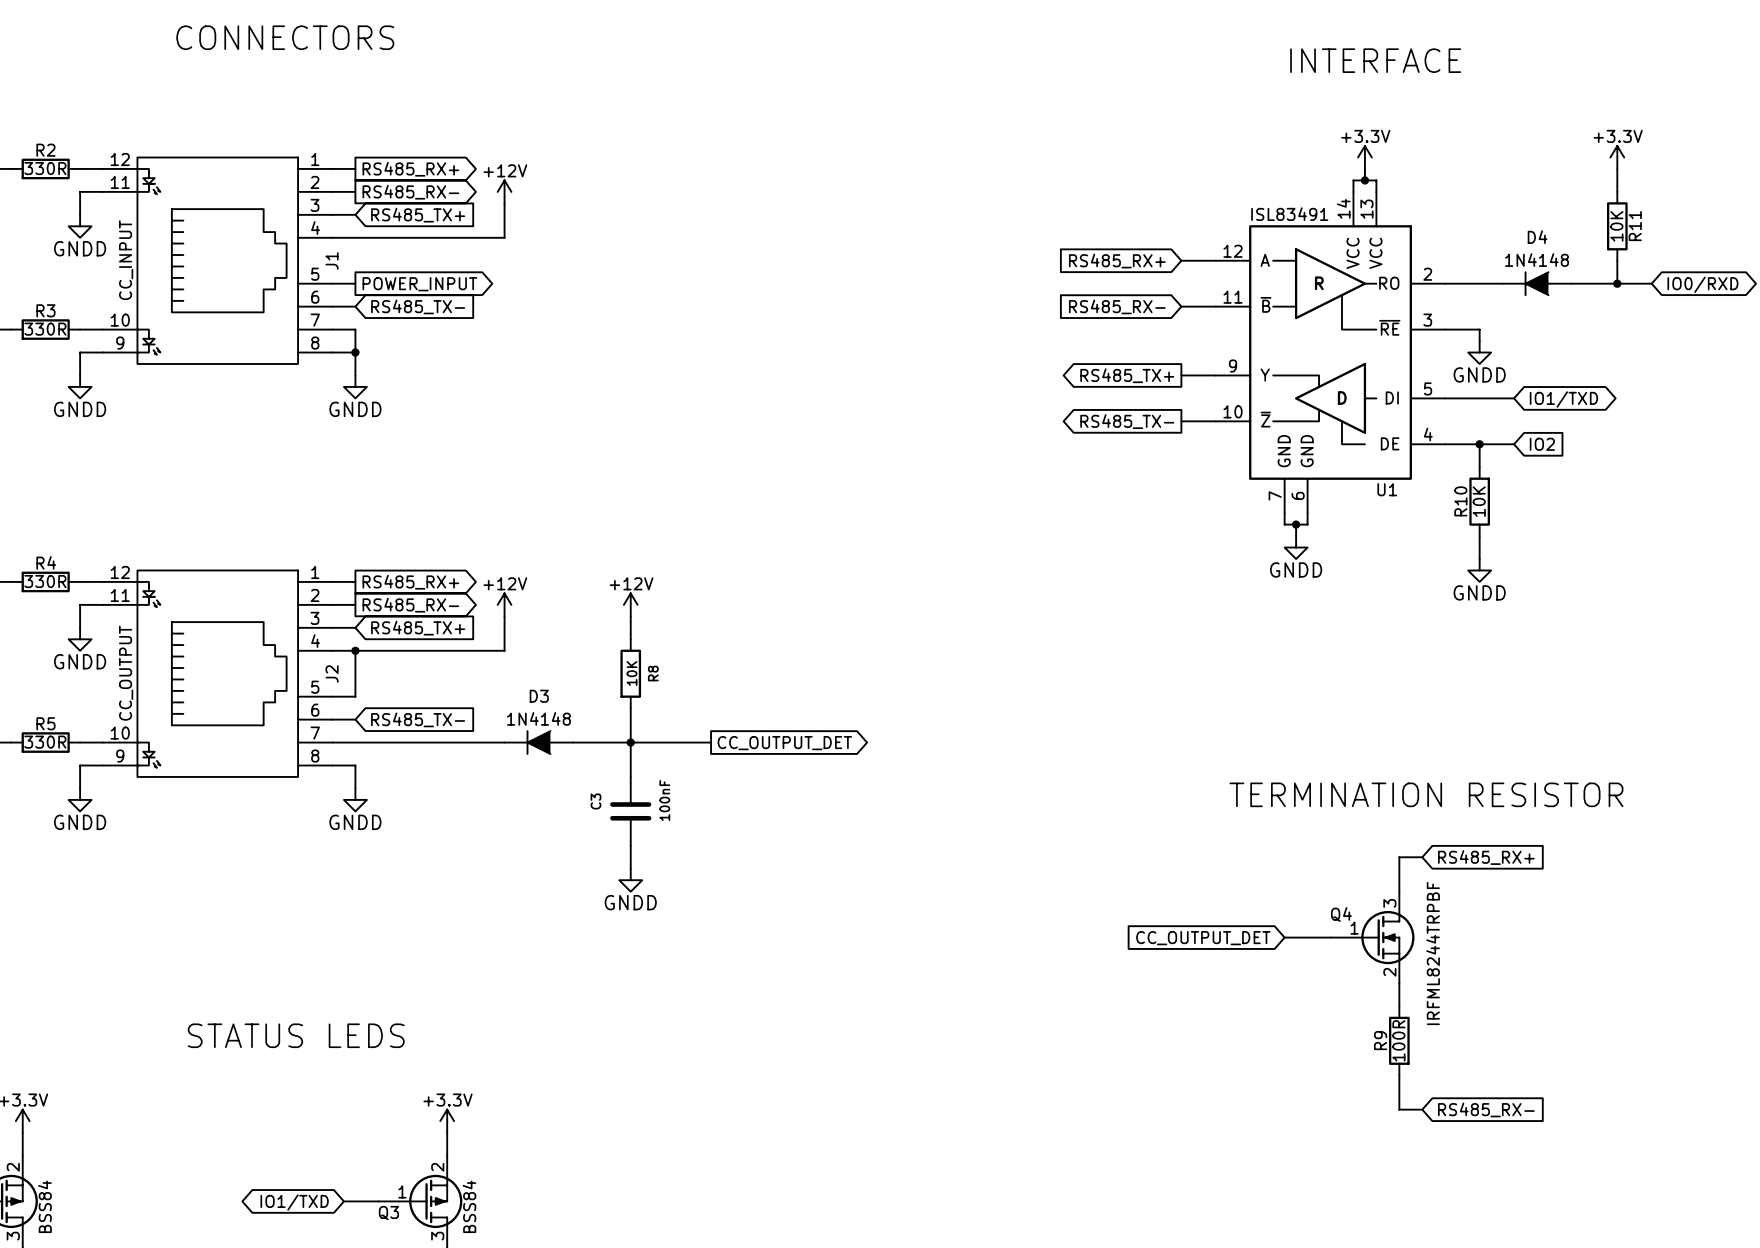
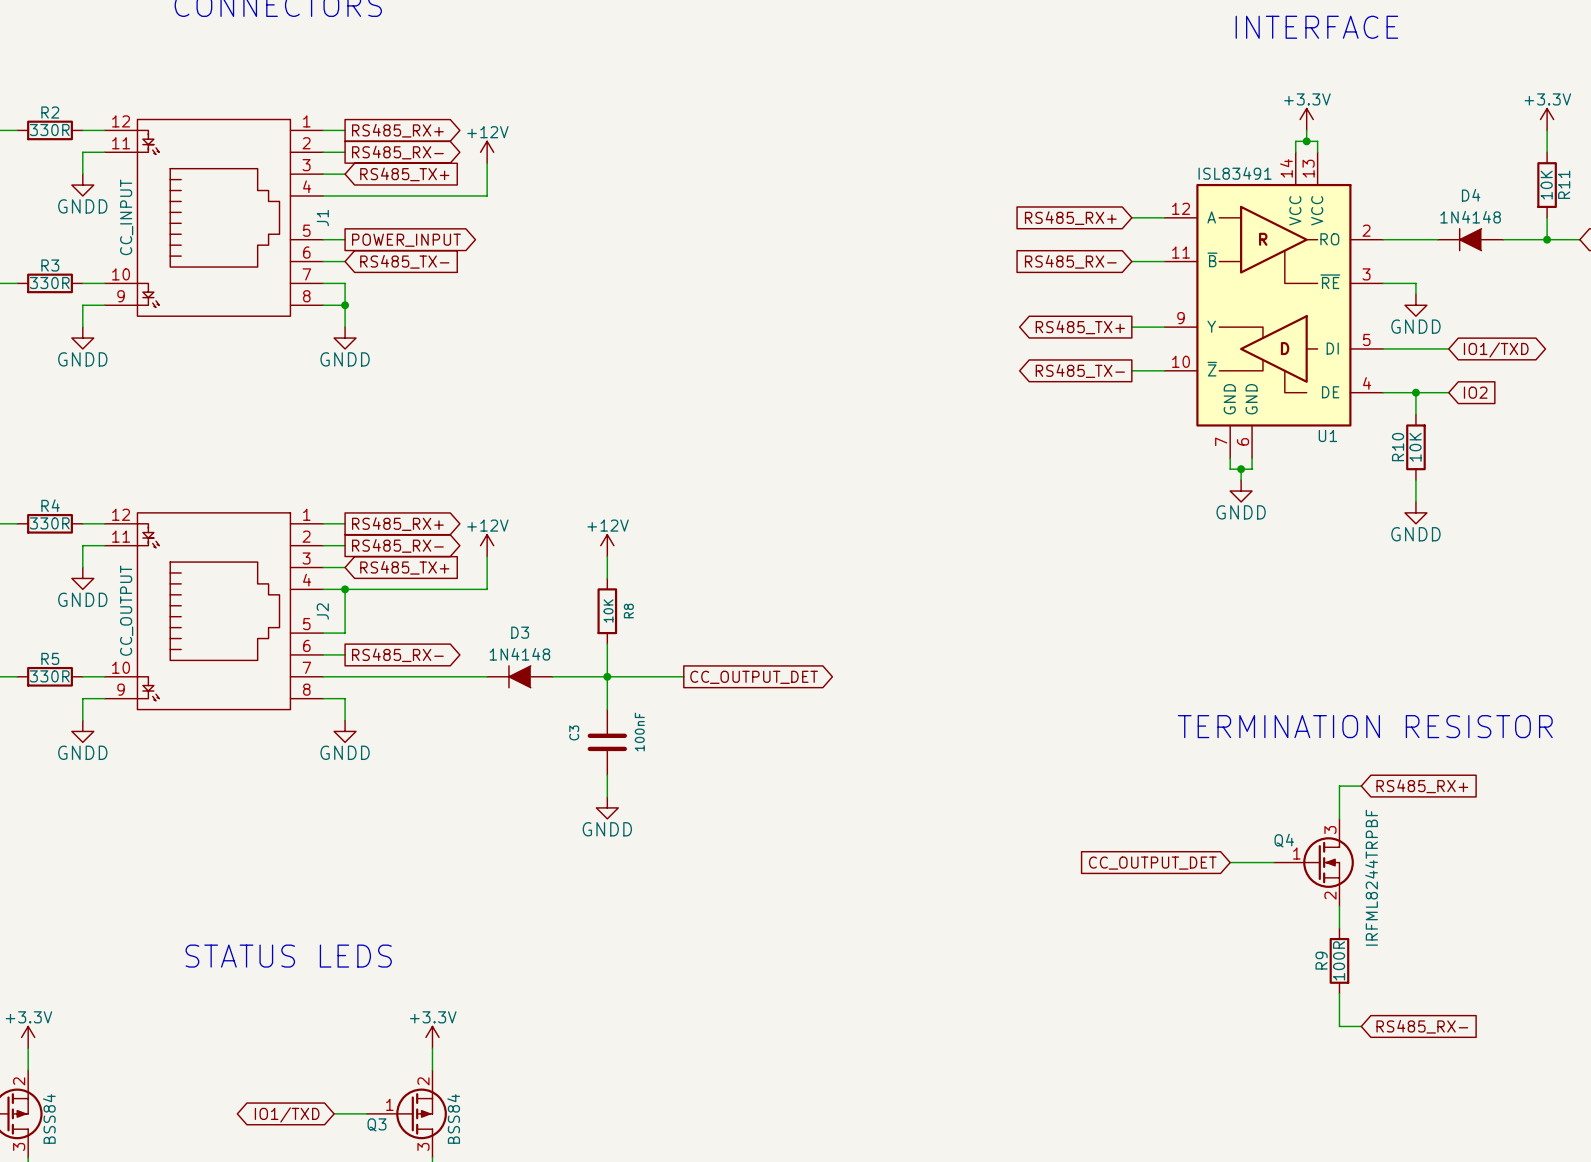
global label shape: input (418, 719) -> output (397, 655)
global label: RS485_TX- (418, 719) -> RS485_RX- (397, 655)

